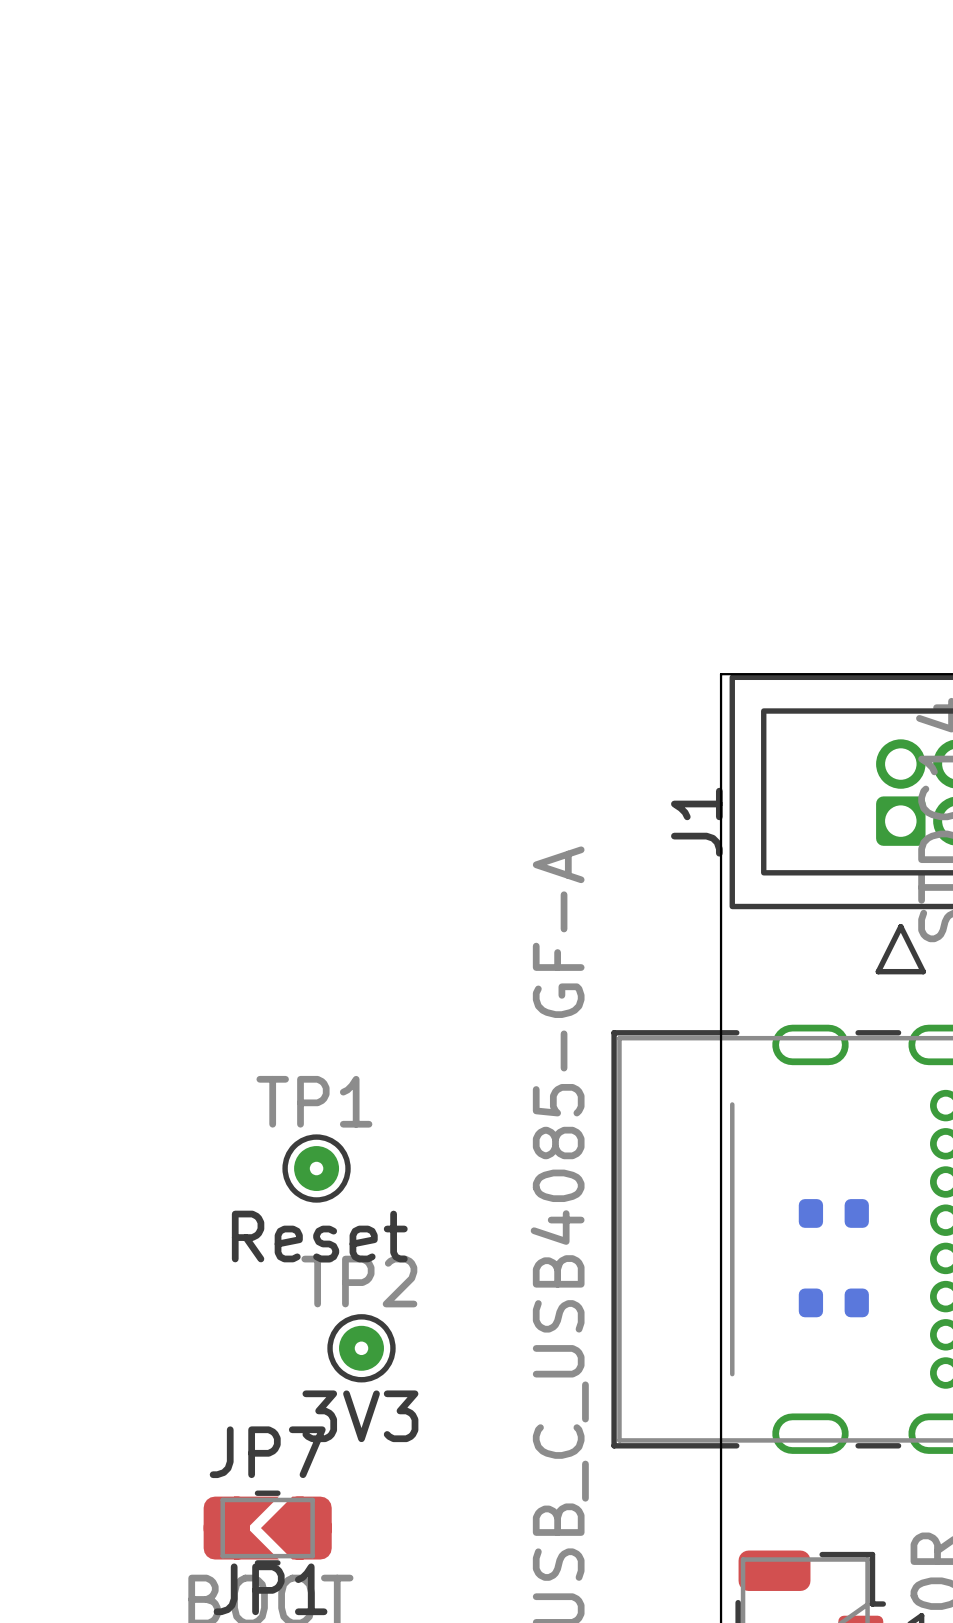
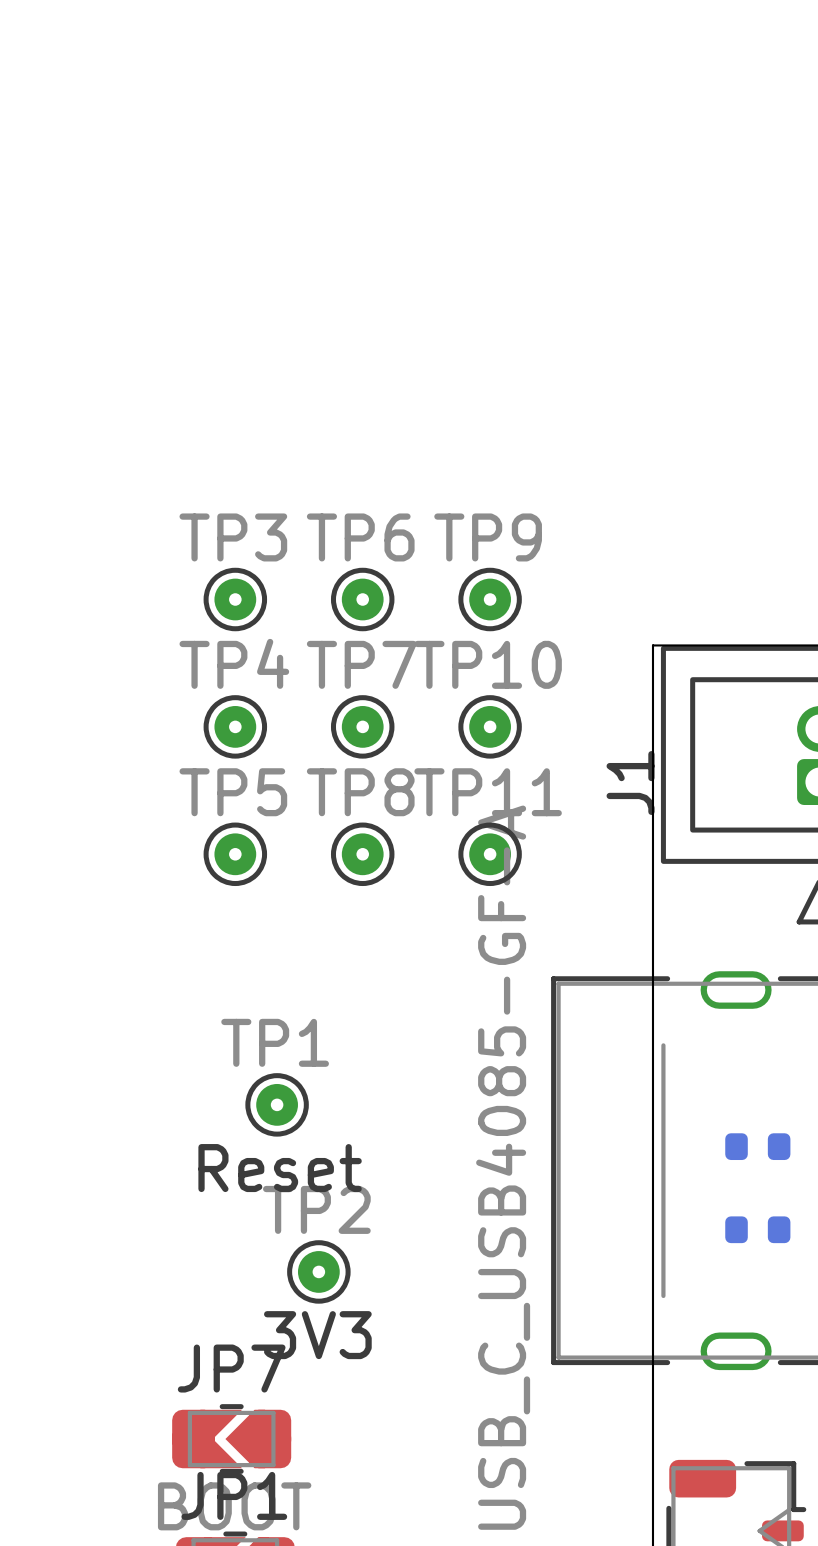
TP3: none -> (235, 599)
TP6: none -> (362, 599)
TP9: none -> (490, 599)
TP4: none -> (235, 726)
TP7: none -> (362, 726)
TP10: none -> (490, 726)
TP5: none -> (235, 854)
TP8: none -> (362, 854)
TP11: none -> (490, 854)

